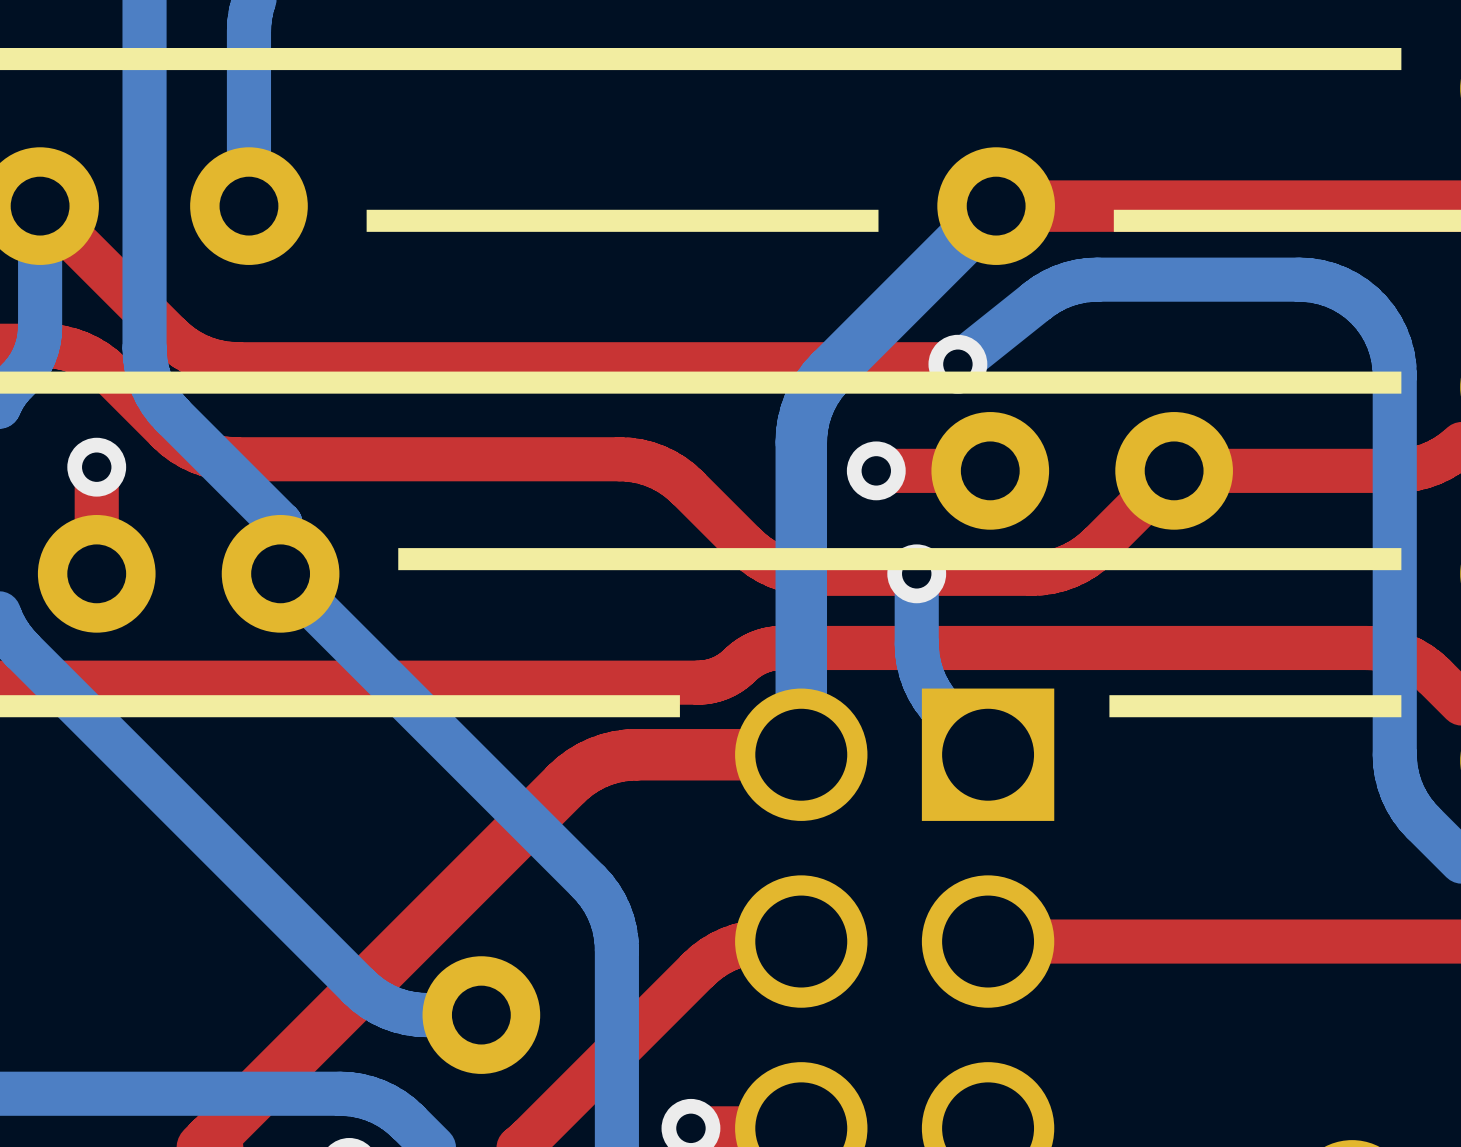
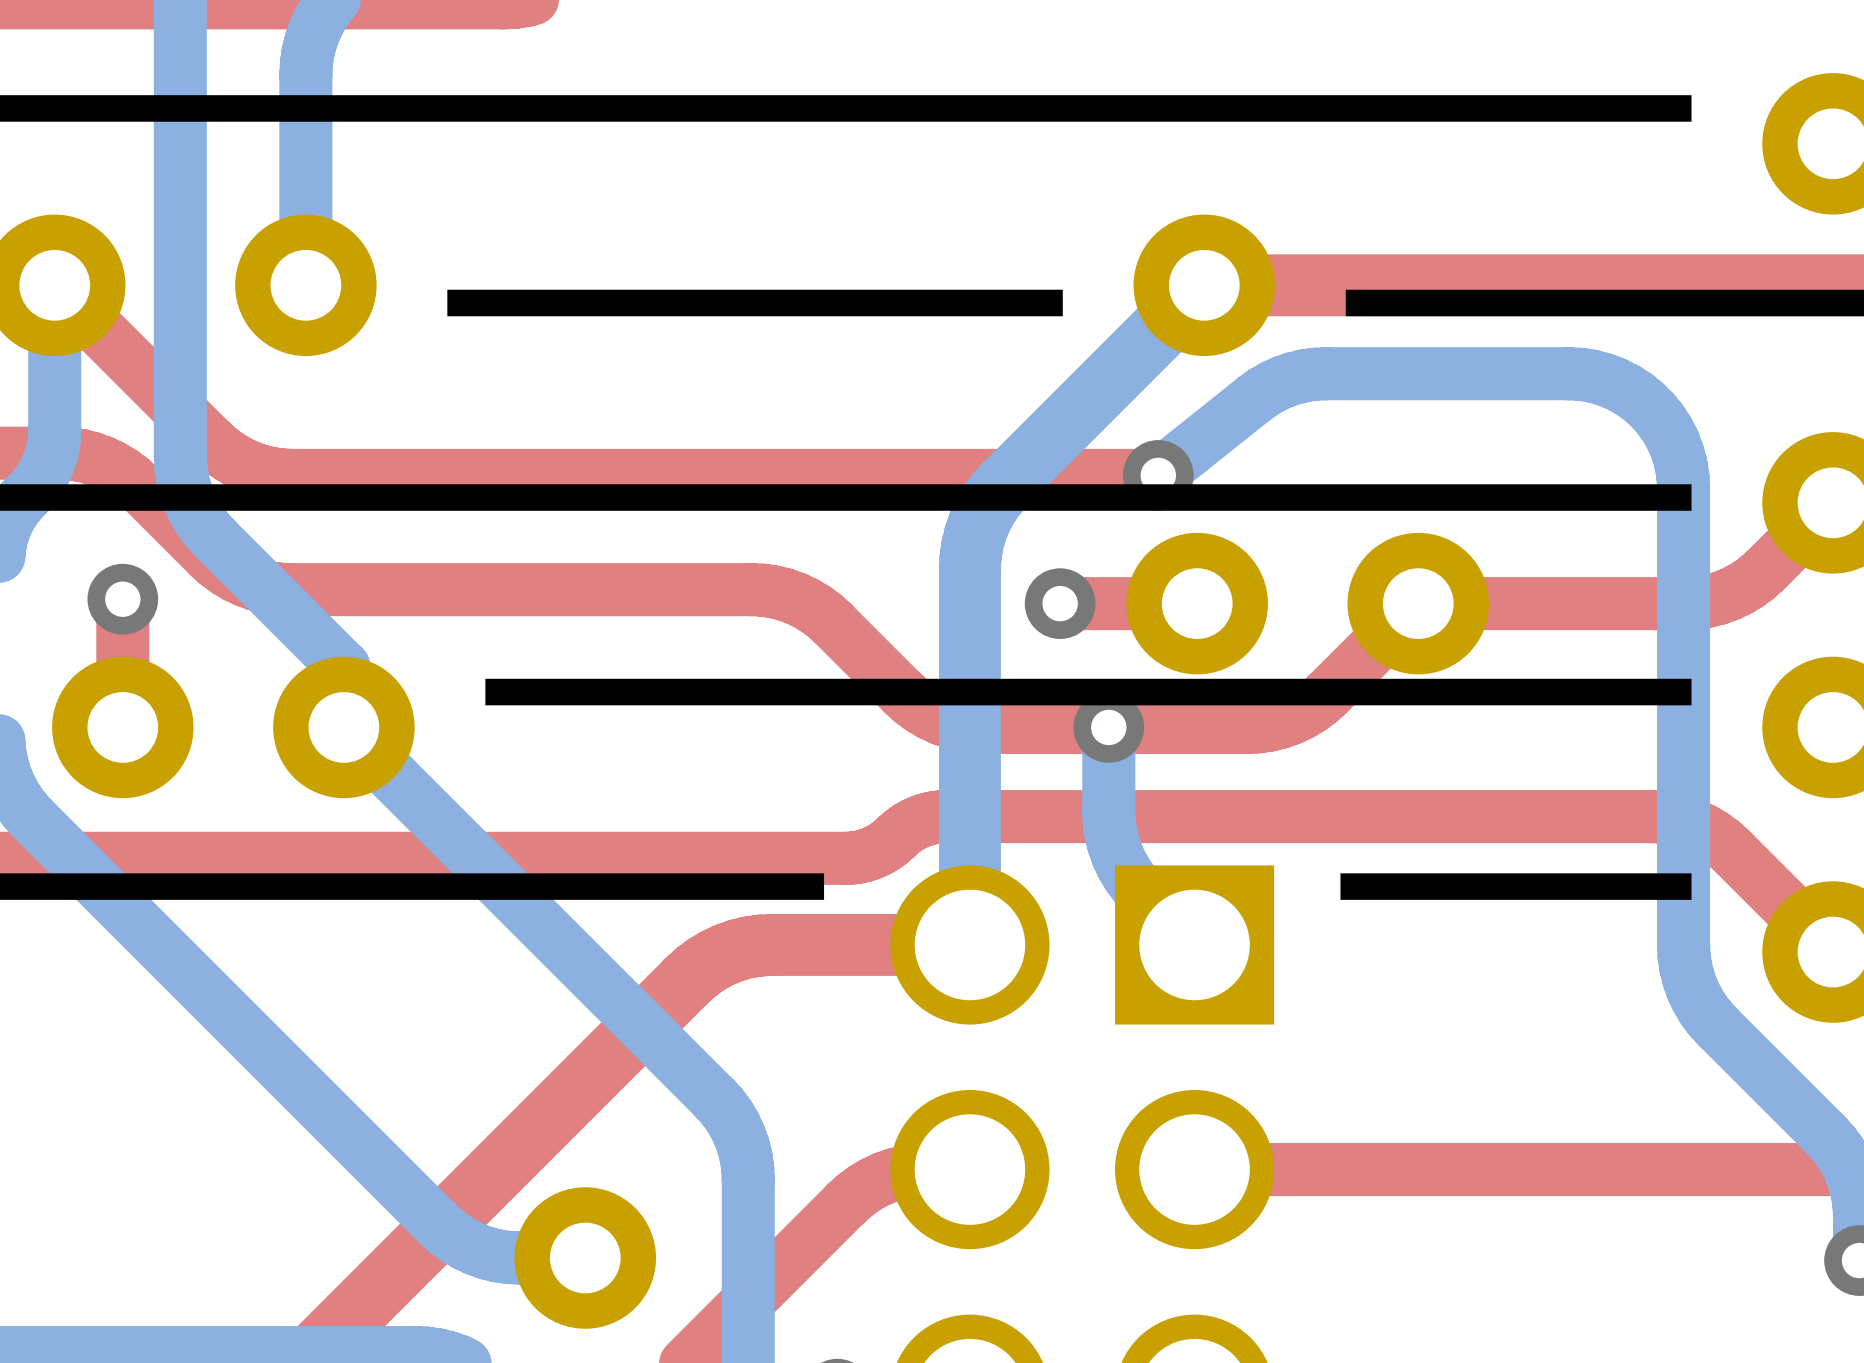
drawing position: (899, 559) -> (1088, 692)

